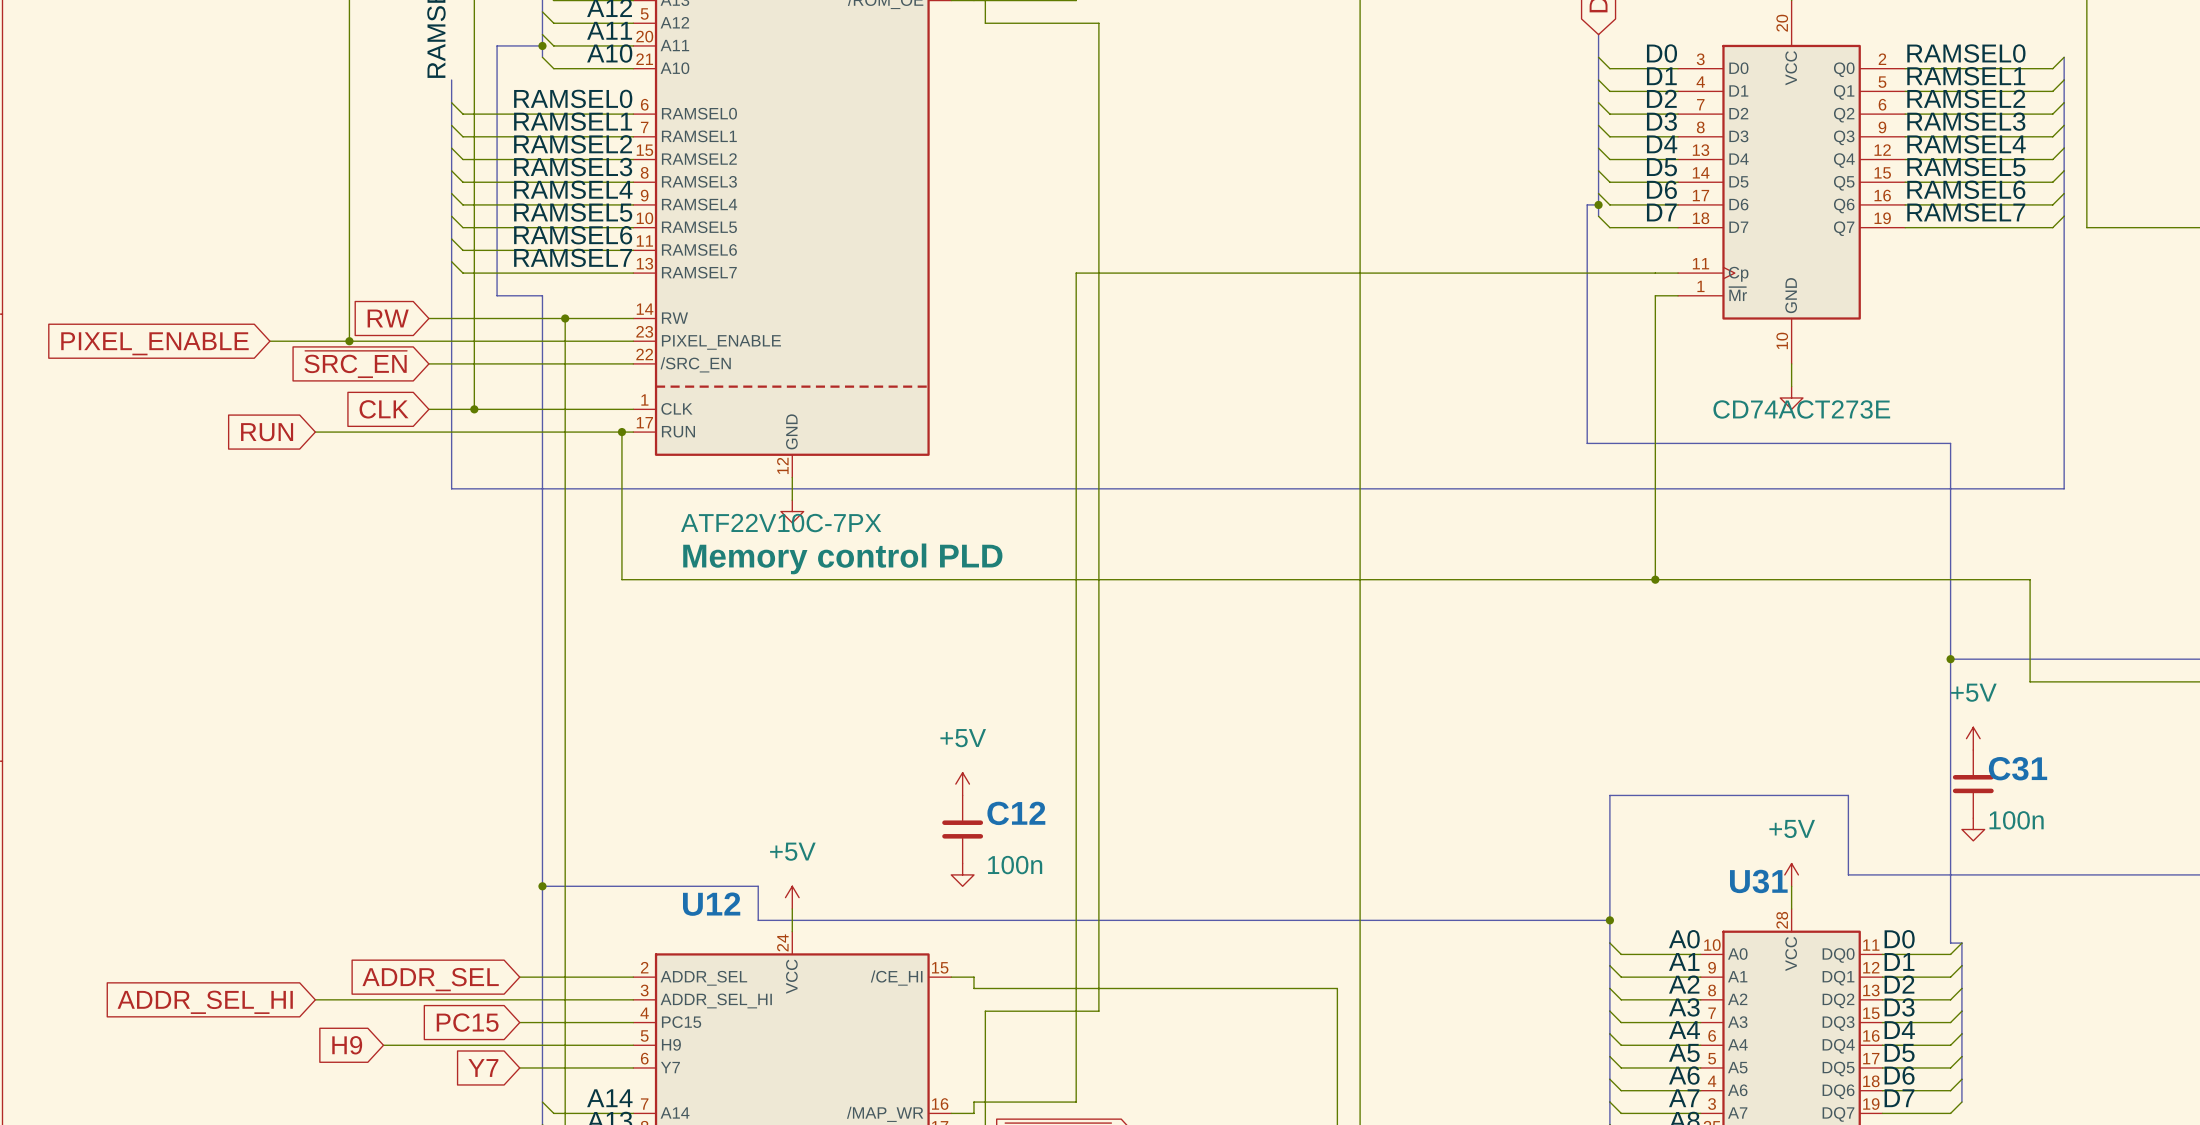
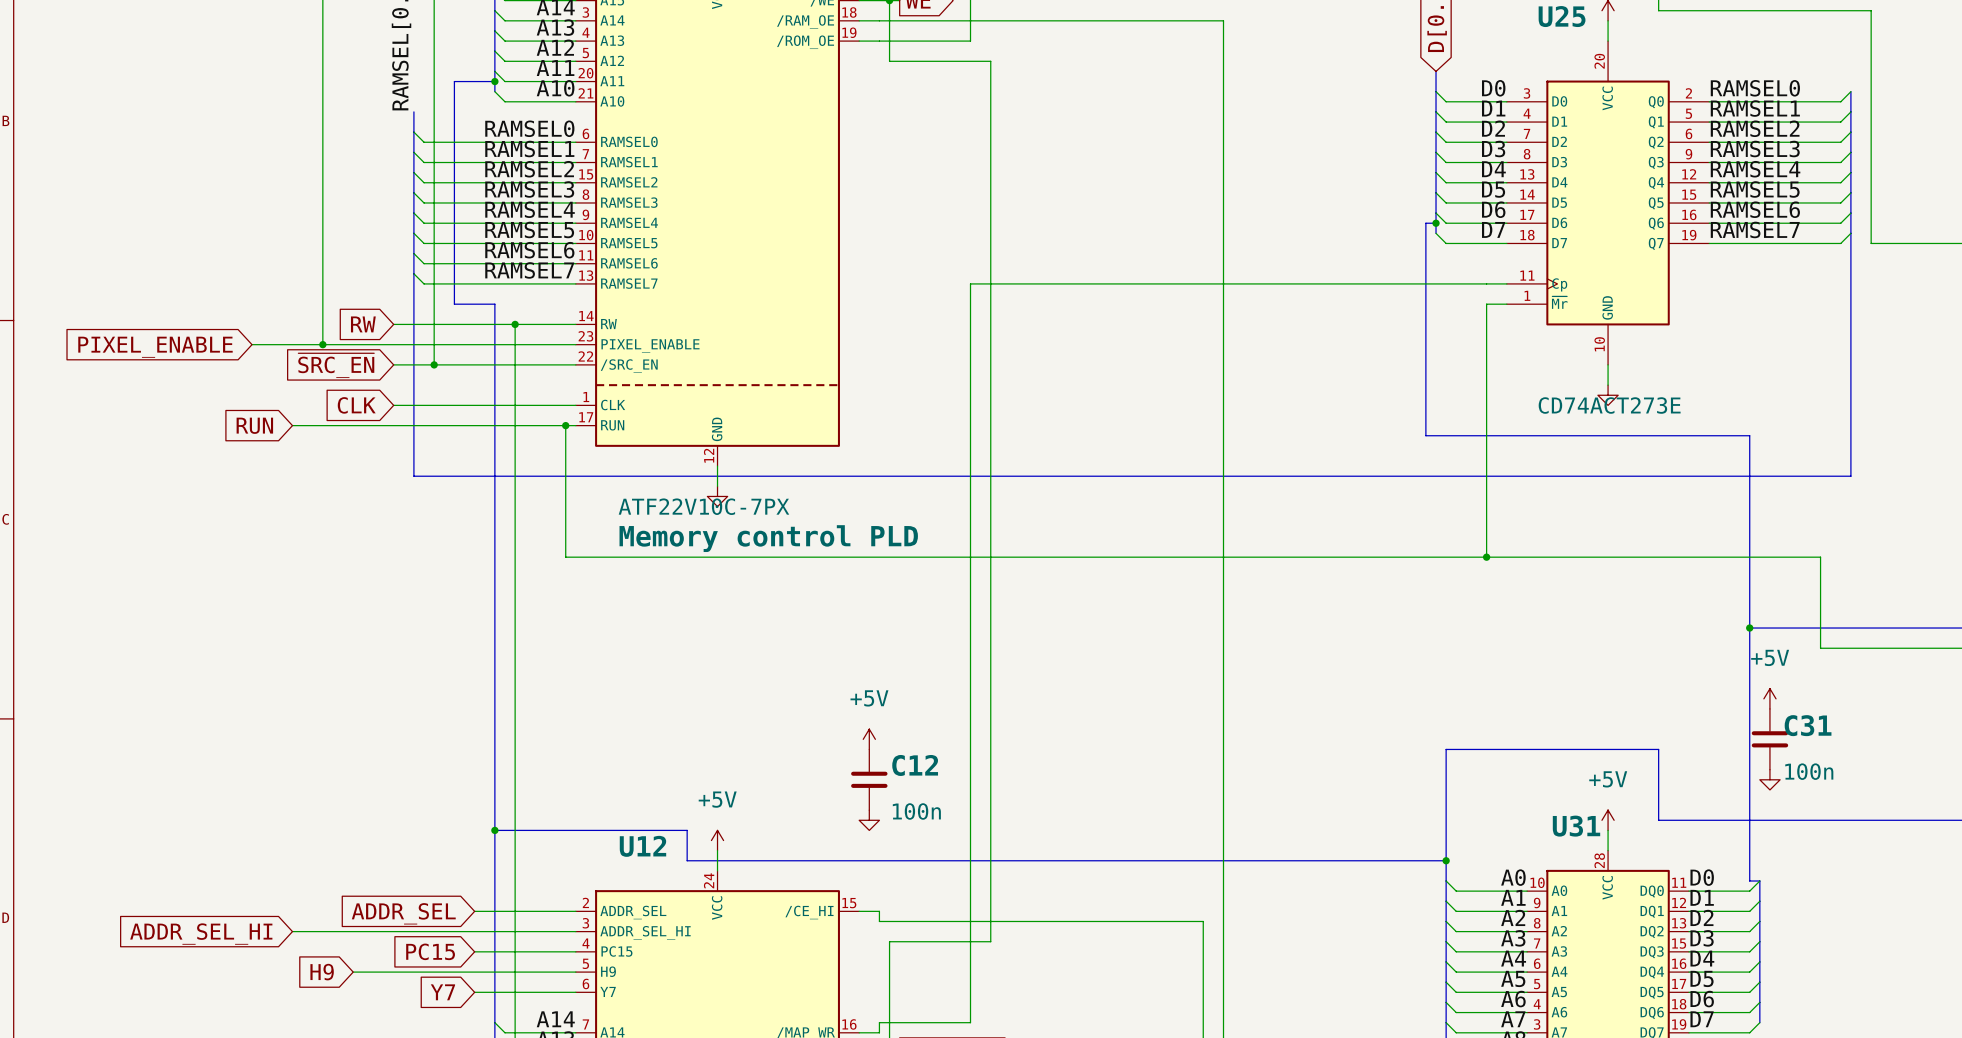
wire: (474, 363) (474, 409) -> none
junction position: (474, 409) -> (434, 364)

